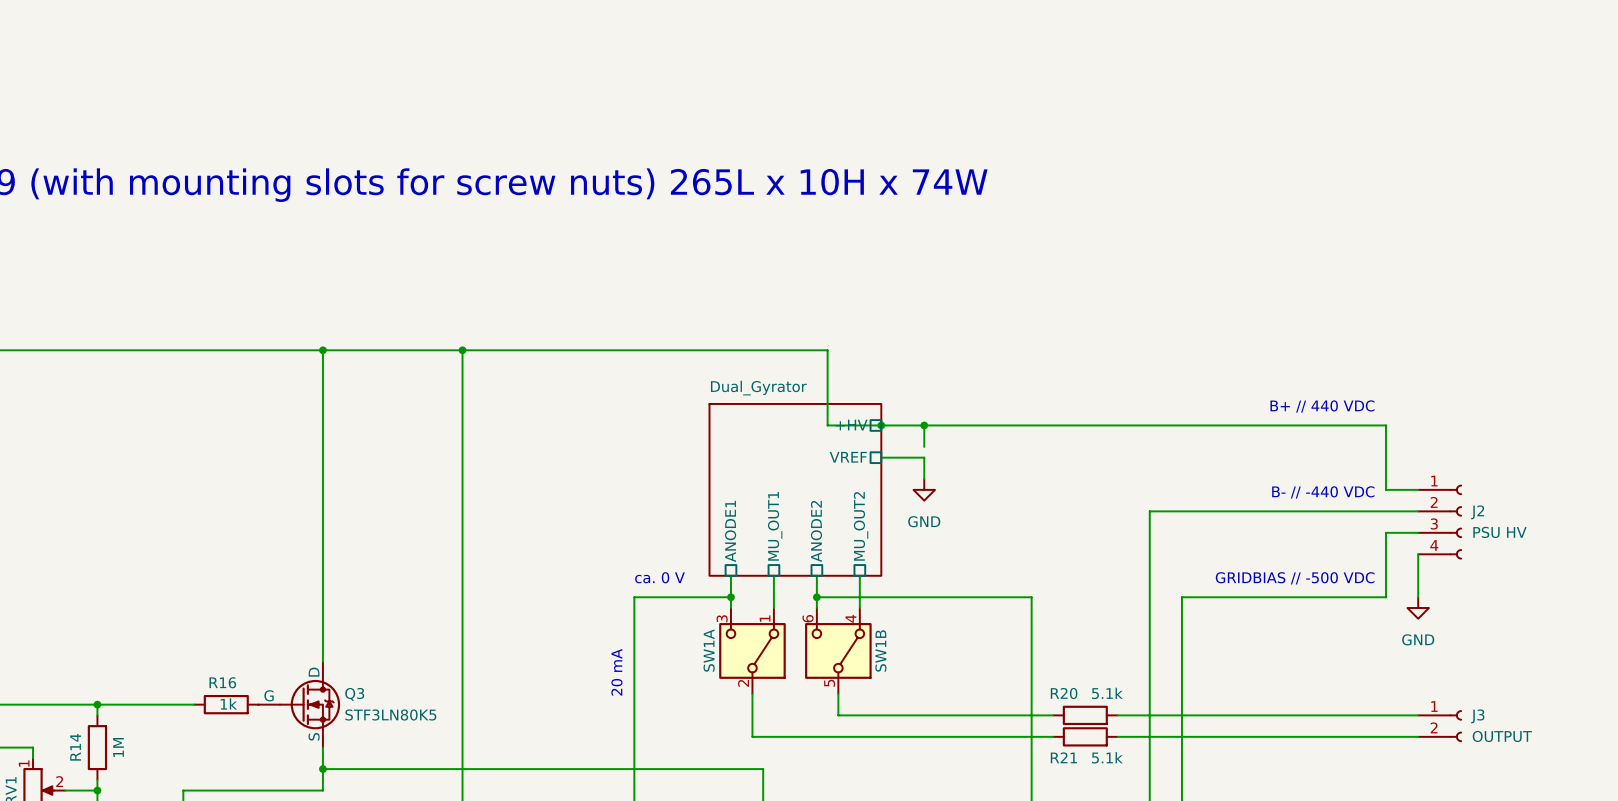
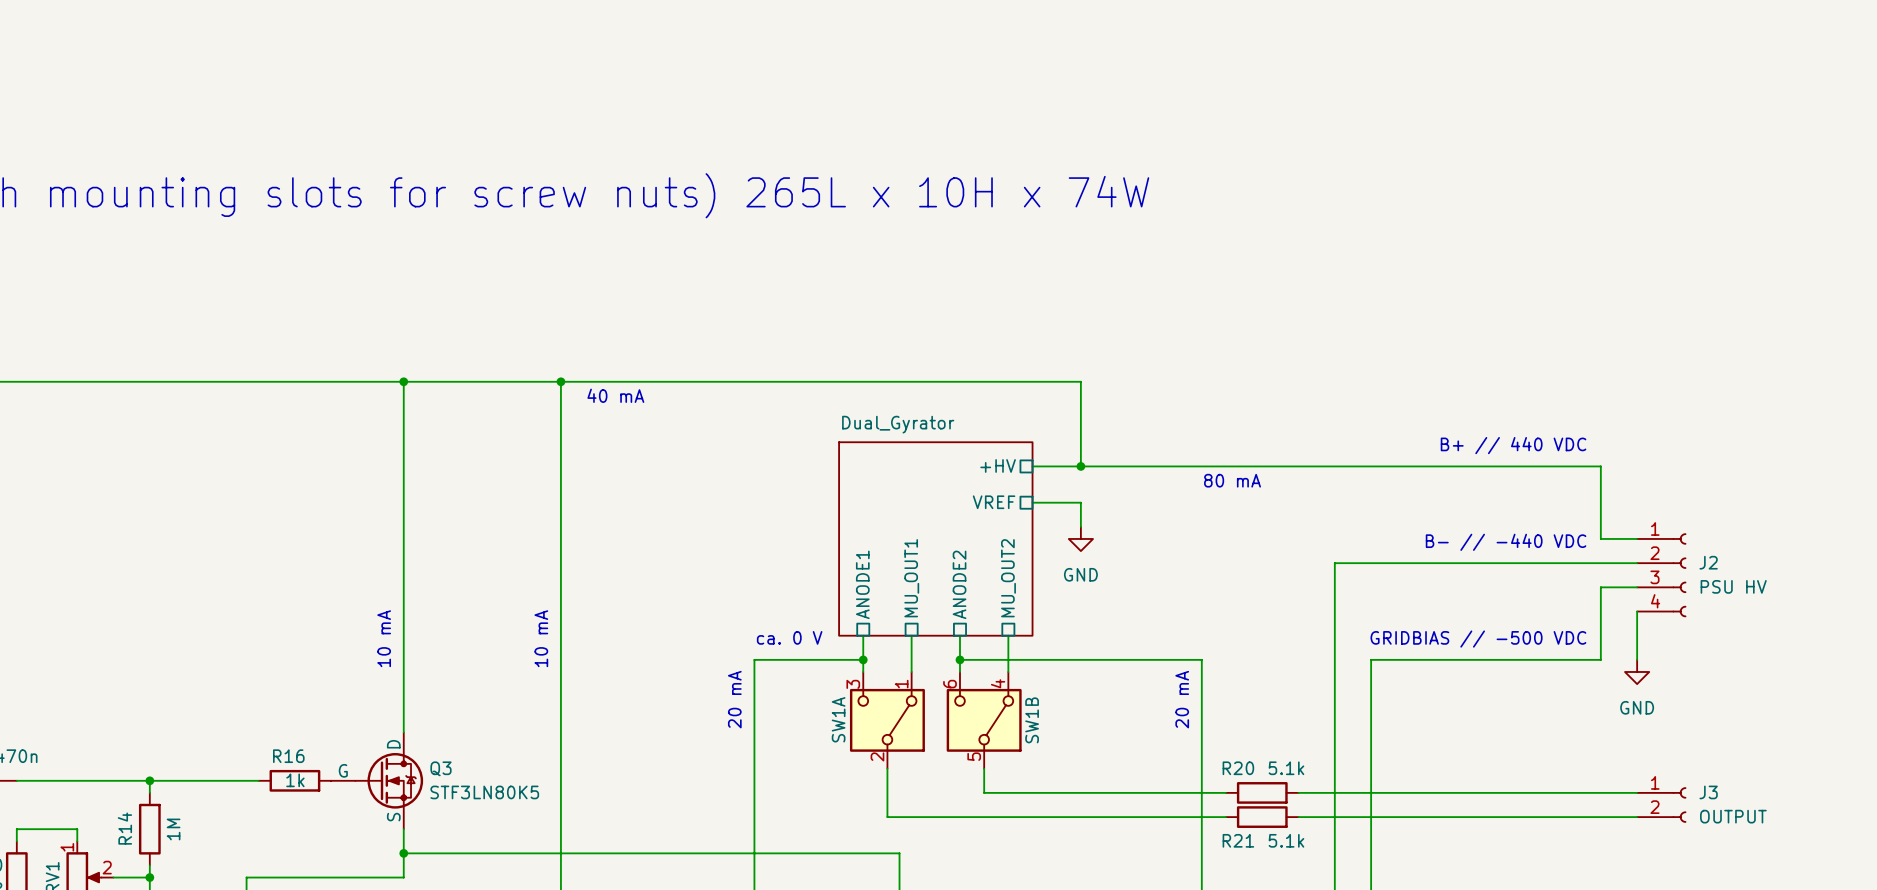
wire: (827, 350) (827, 425) (881, 425) -> (972, 381) (1080, 381) (1080, 466)
text: none -> 40 mA (615, 395)
junction: (881, 425) -> none
wire: (924, 425) (924, 446) -> none
text: none -> 80 mA (1232, 480)
text: none -> 10 mA (384, 638)
text: none -> 10 mA (541, 638)
text: none -> 20 mA (1182, 699)
text position: 20 mA (616, 672) -> 20 mA (734, 699)

